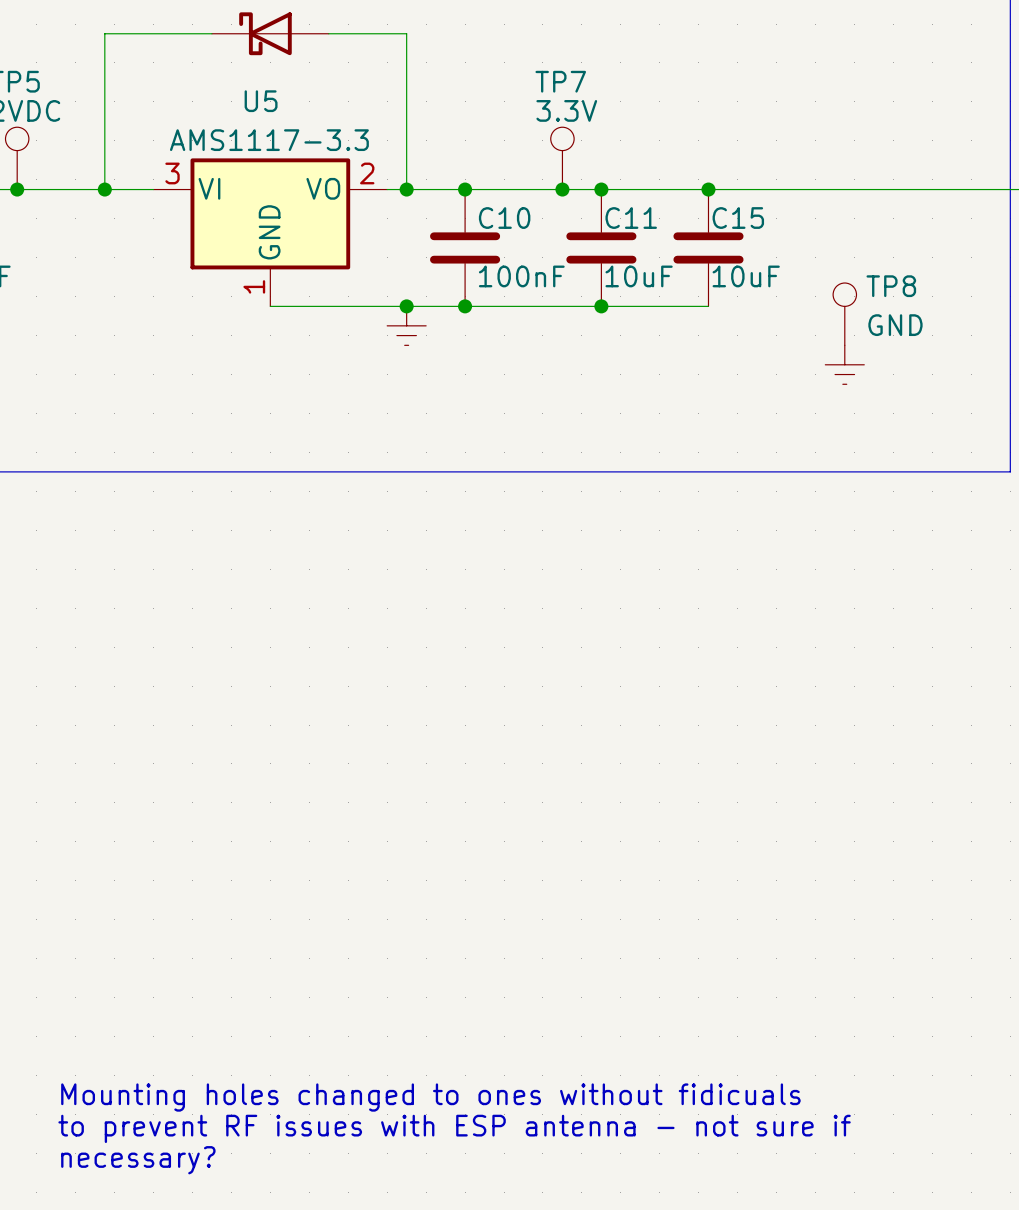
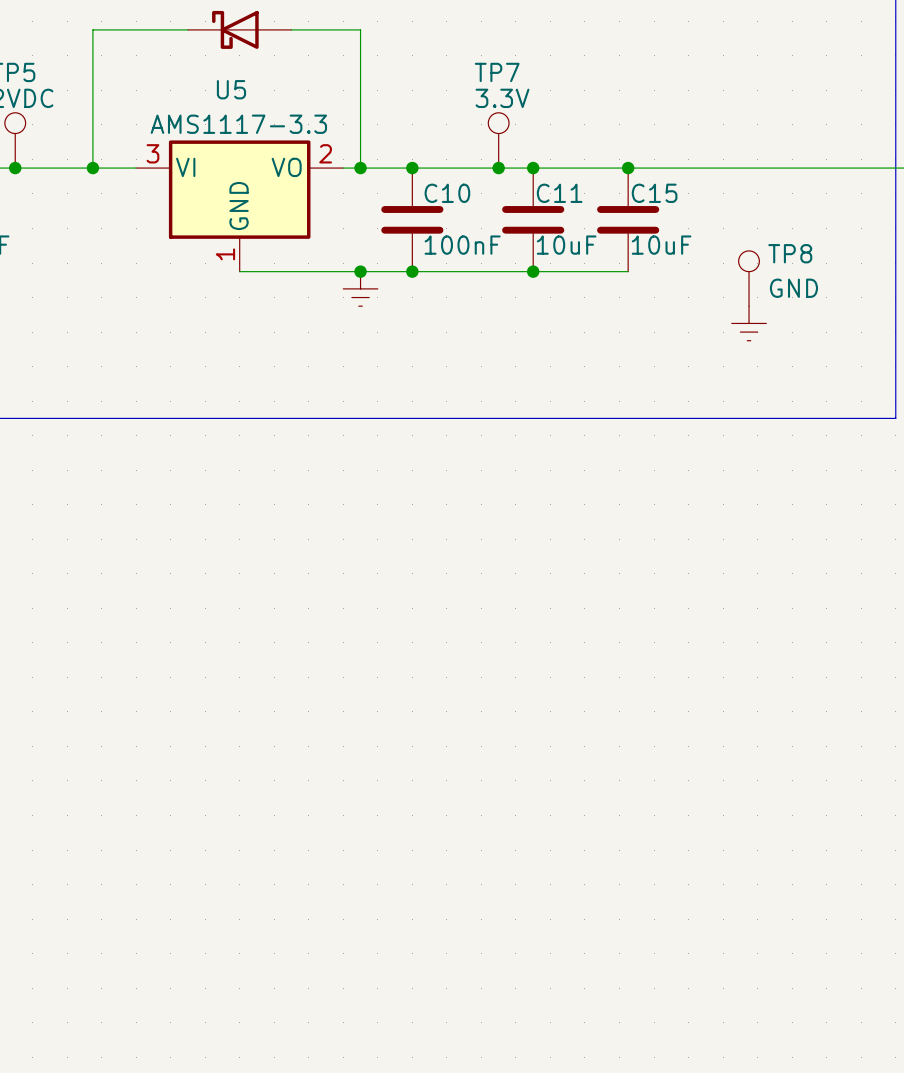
text: Mounting holes changed to ones without fidicuals (430, 1097) -> none
text: to prevent RF issues with ESP antenna - not sure if (454, 1128) -> none
text: necessary? (138, 1160) -> none

